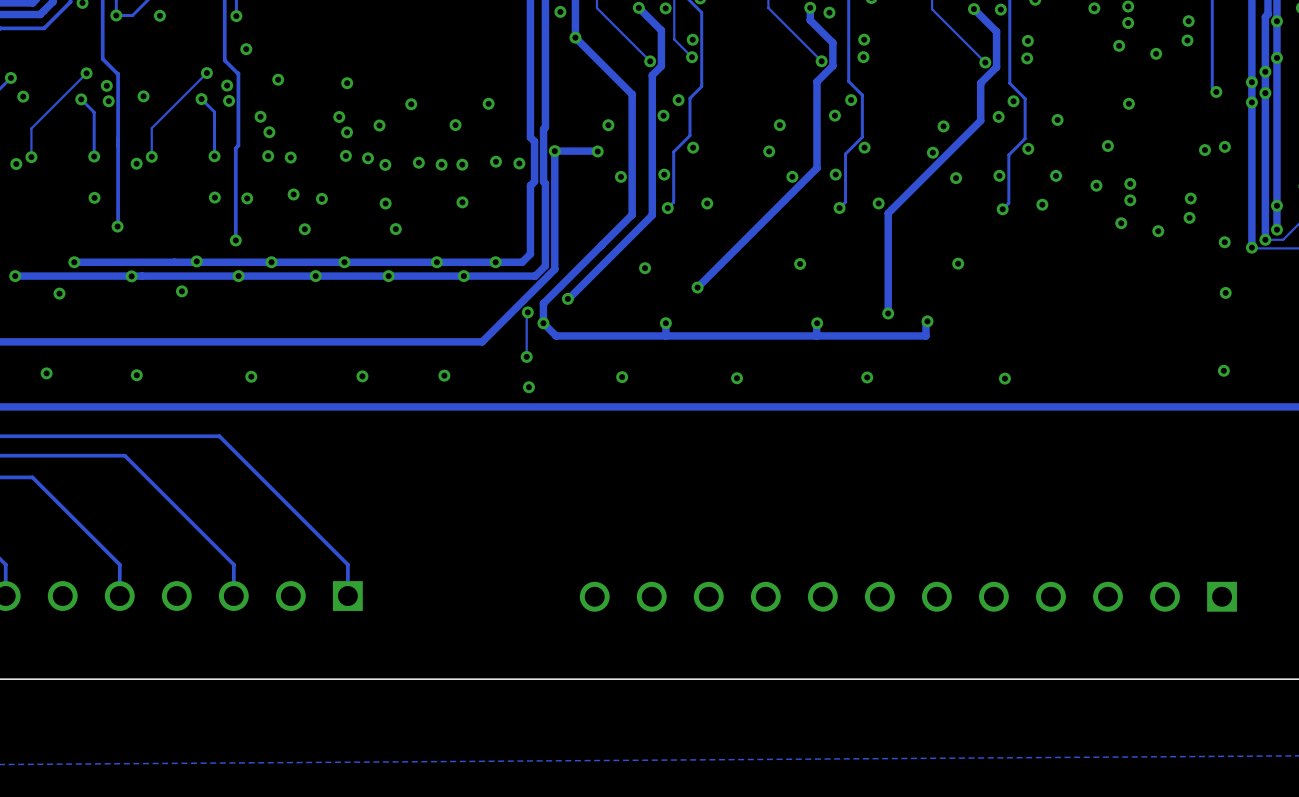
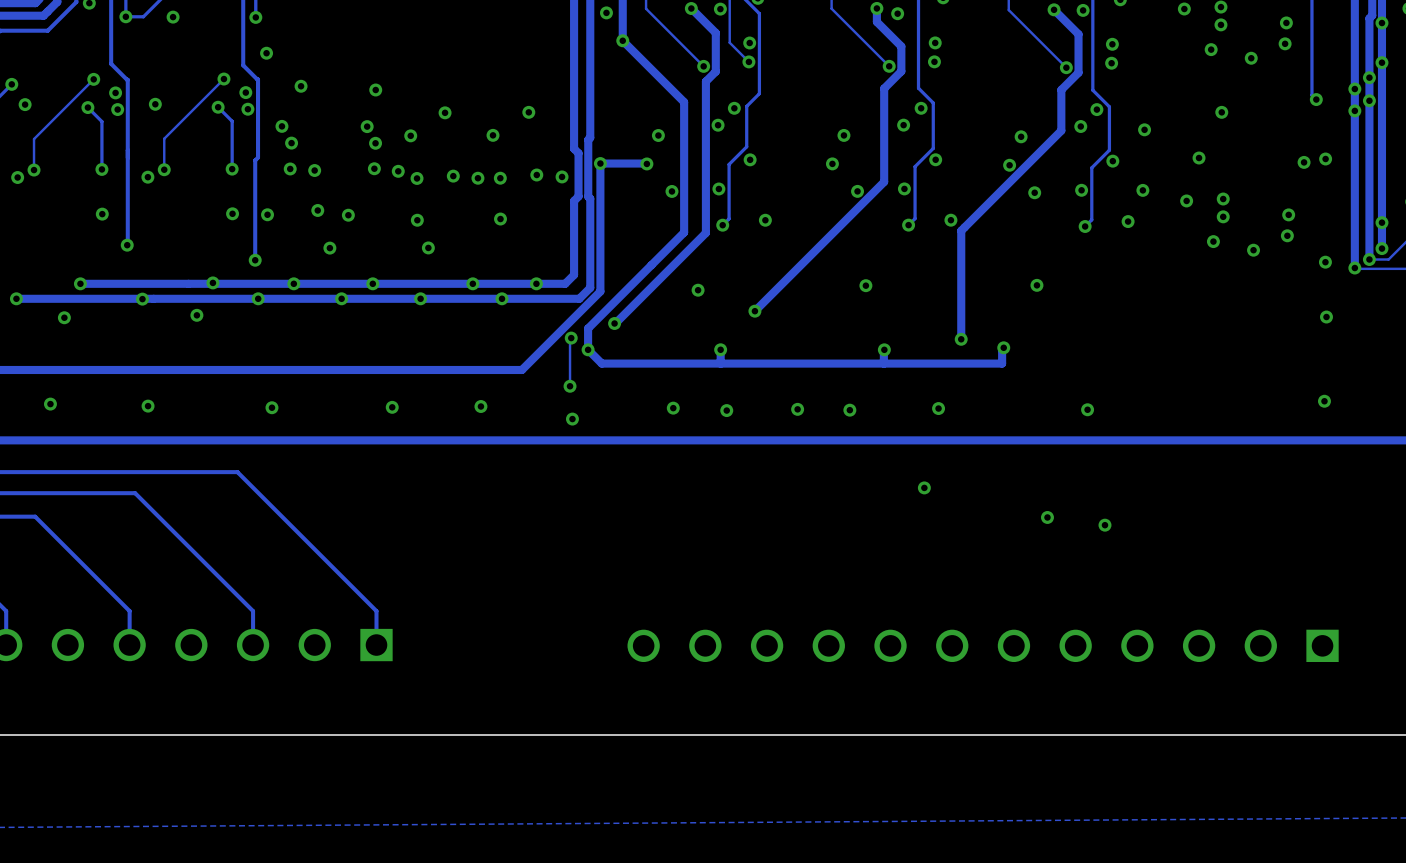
via: none -> (849, 410)
via: none -> (726, 410)
via: none -> (924, 487)
via: none -> (1047, 517)
via: none -> (1104, 525)

